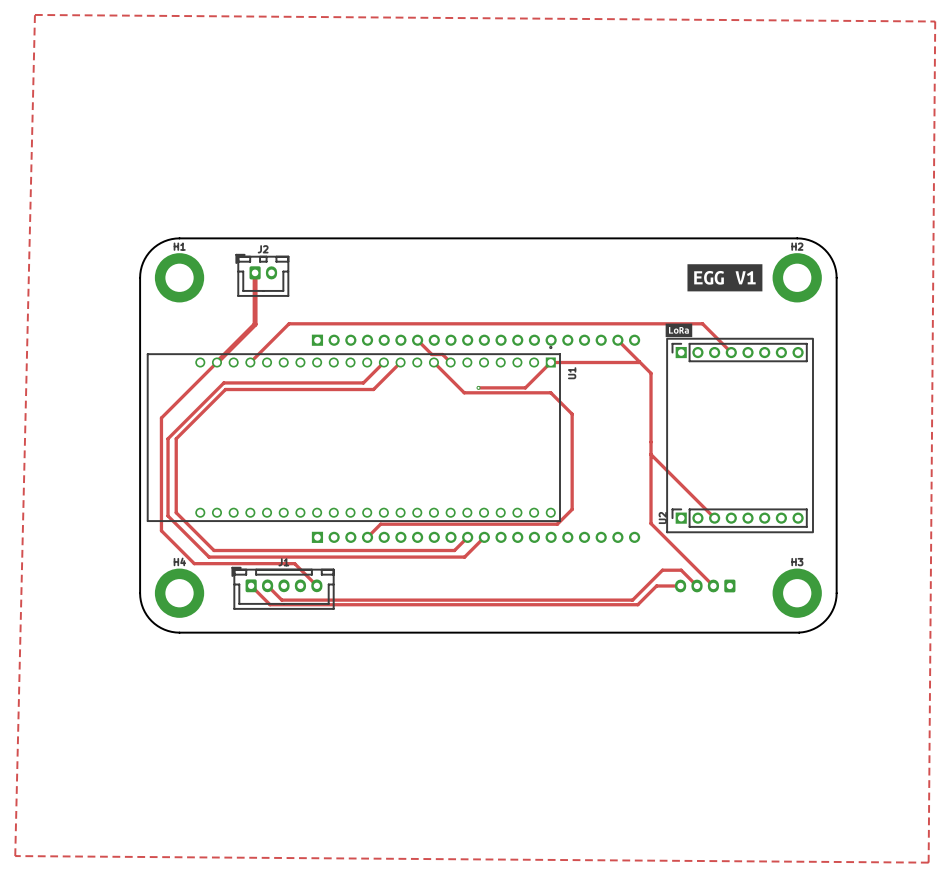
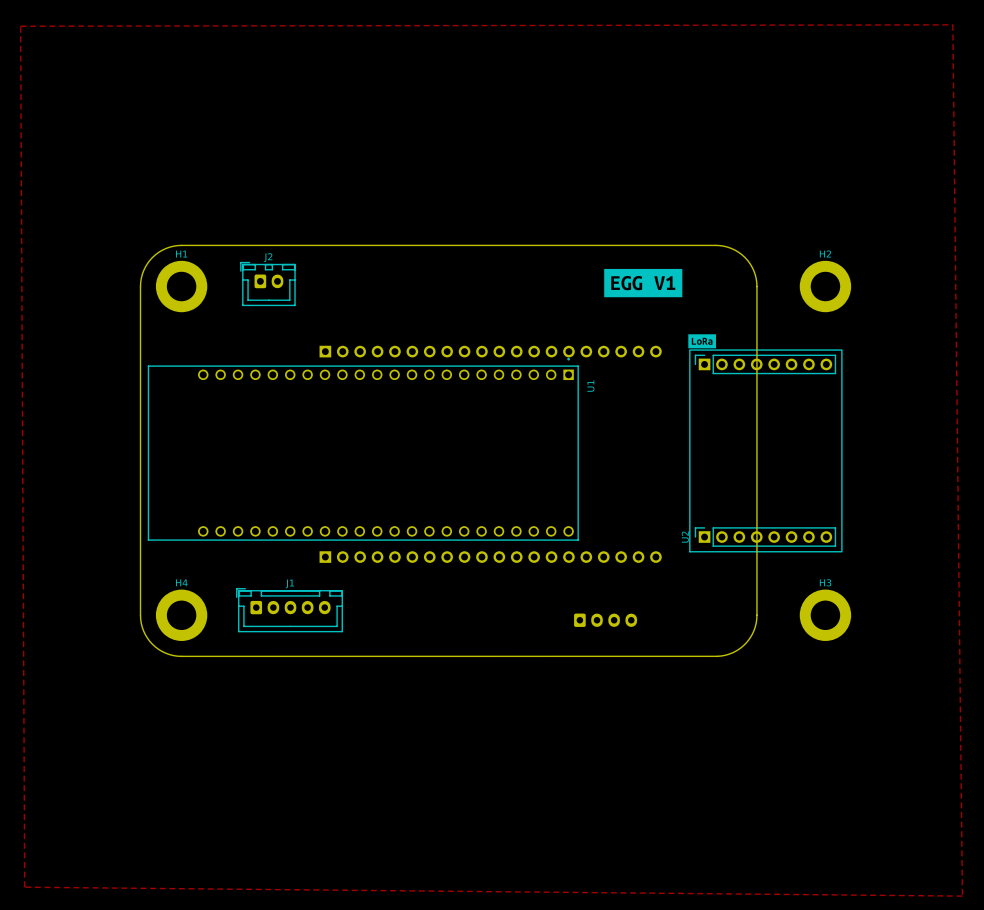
zone outline: (34, 14) (935, 21) (928, 862) (15, 856) (34, 14) -> (952, 24) (20, 26) (24, 887) (962, 896) (952, 24)
board edge: (692, 238) (804, 239) (815, 243) (825, 249) (834, 266) (836, 277) (836, 596) (833, 607) (825, 620) (813, 629) (799, 632) -> none
track: (255, 272) (255, 324) (161, 418) (161, 530) (194, 563) (294, 563) (316, 585) -> none
drawing position: (724, 277) -> (643, 283)
track: (417, 340) (431, 354) (442, 354) (450, 362) -> none
track: (617, 340) (651, 373) (651, 523) (713, 585) (713, 589) -> none
track: (731, 352) (702, 323) (289, 323) (250, 362) -> none
track: (639, 361) (550, 362) (525, 387) (478, 387) -> none
track: (383, 362) (363, 382) (223, 382) (168, 438) (168, 516) (209, 557) (464, 557) (484, 537) -> none
track: (400, 362) (373, 389) (225, 389) (176, 438) (176, 512) (214, 550) (454, 550) (467, 537) -> none
track: (433, 362) (464, 392) (550, 392) (572, 414) (572, 509) (557, 524) (380, 524) (367, 537) -> none
via: (478, 387) -> none
track: (651, 454) (714, 518) -> none
track: (251, 585) (270, 604) (637, 604) (656, 585) (680, 585) -> none
track: (267, 585) (281, 600) (632, 600) (662, 570) (681, 570) (697, 585) -> none
part rotation: 0° (705, 585) -> 180° (605, 620)
part position: (705, 585) -> (605, 620)
board edge: (179, 632) (799, 632) -> (181, 656) (717, 656) (729, 654) (739, 648) (752, 634) (756, 615) (756, 282) (752, 267) (741, 254) (731, 248) (715, 245)

